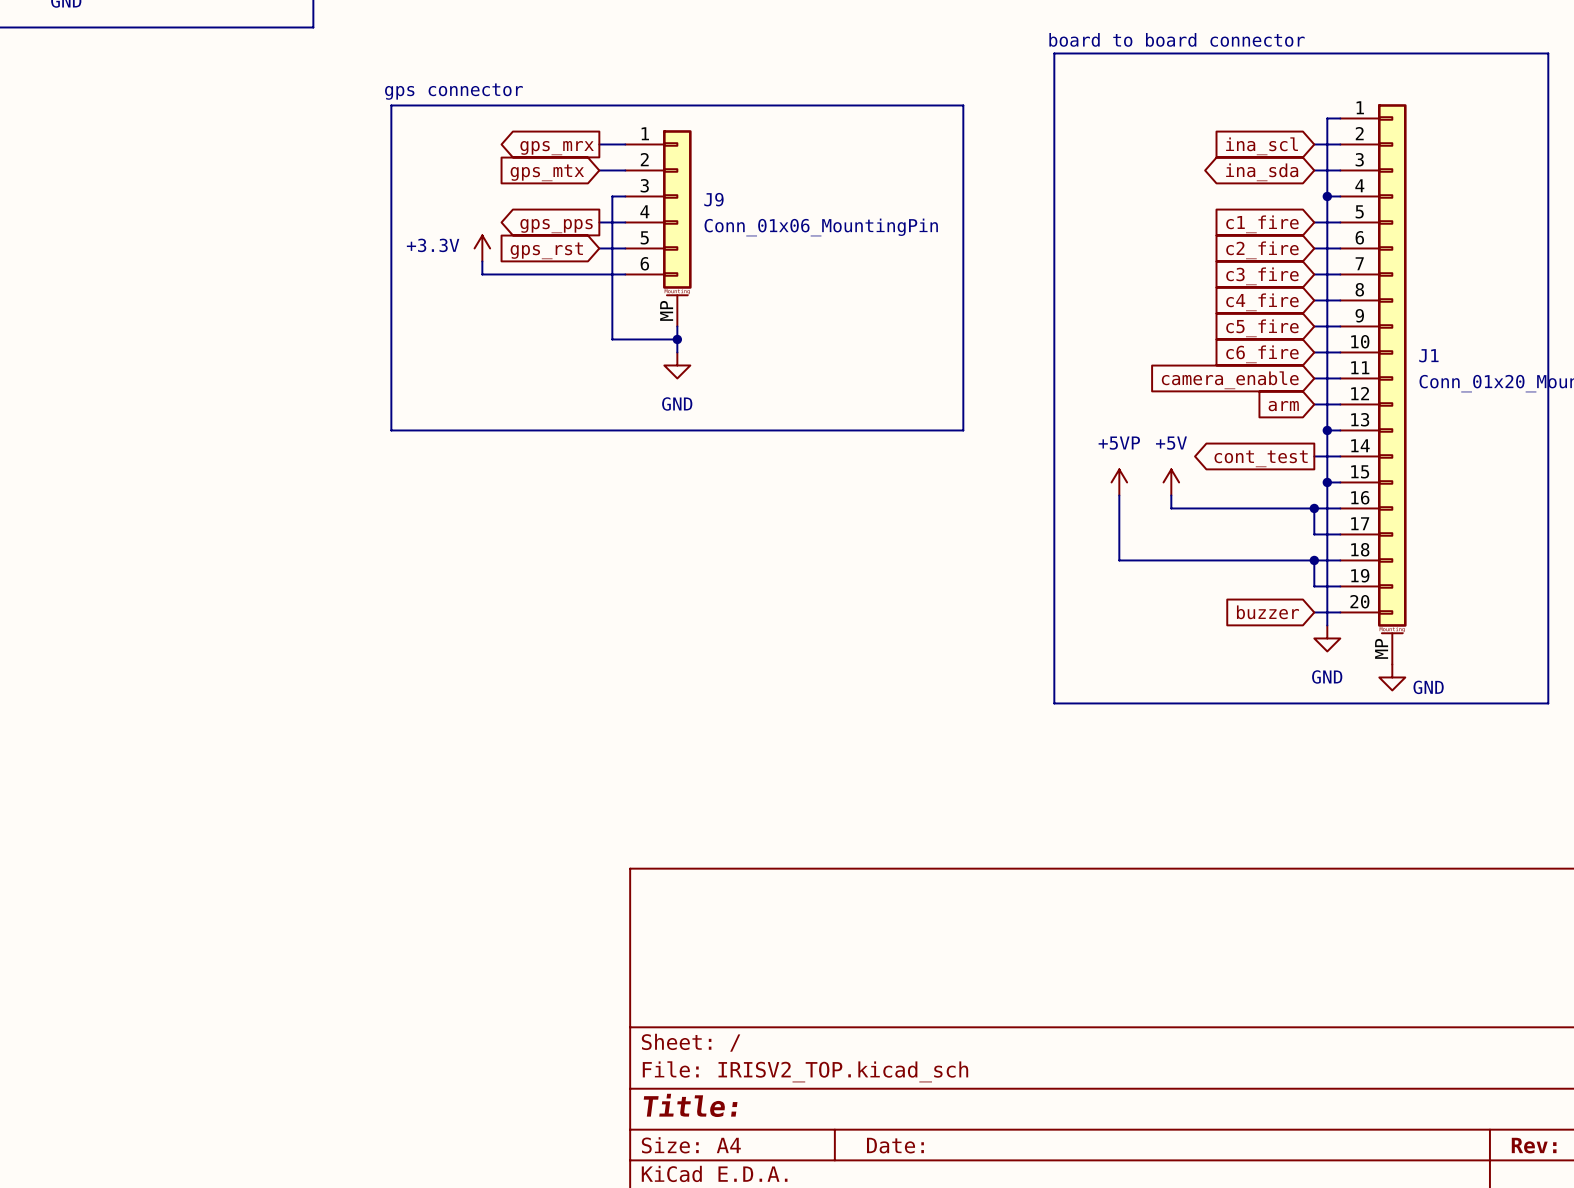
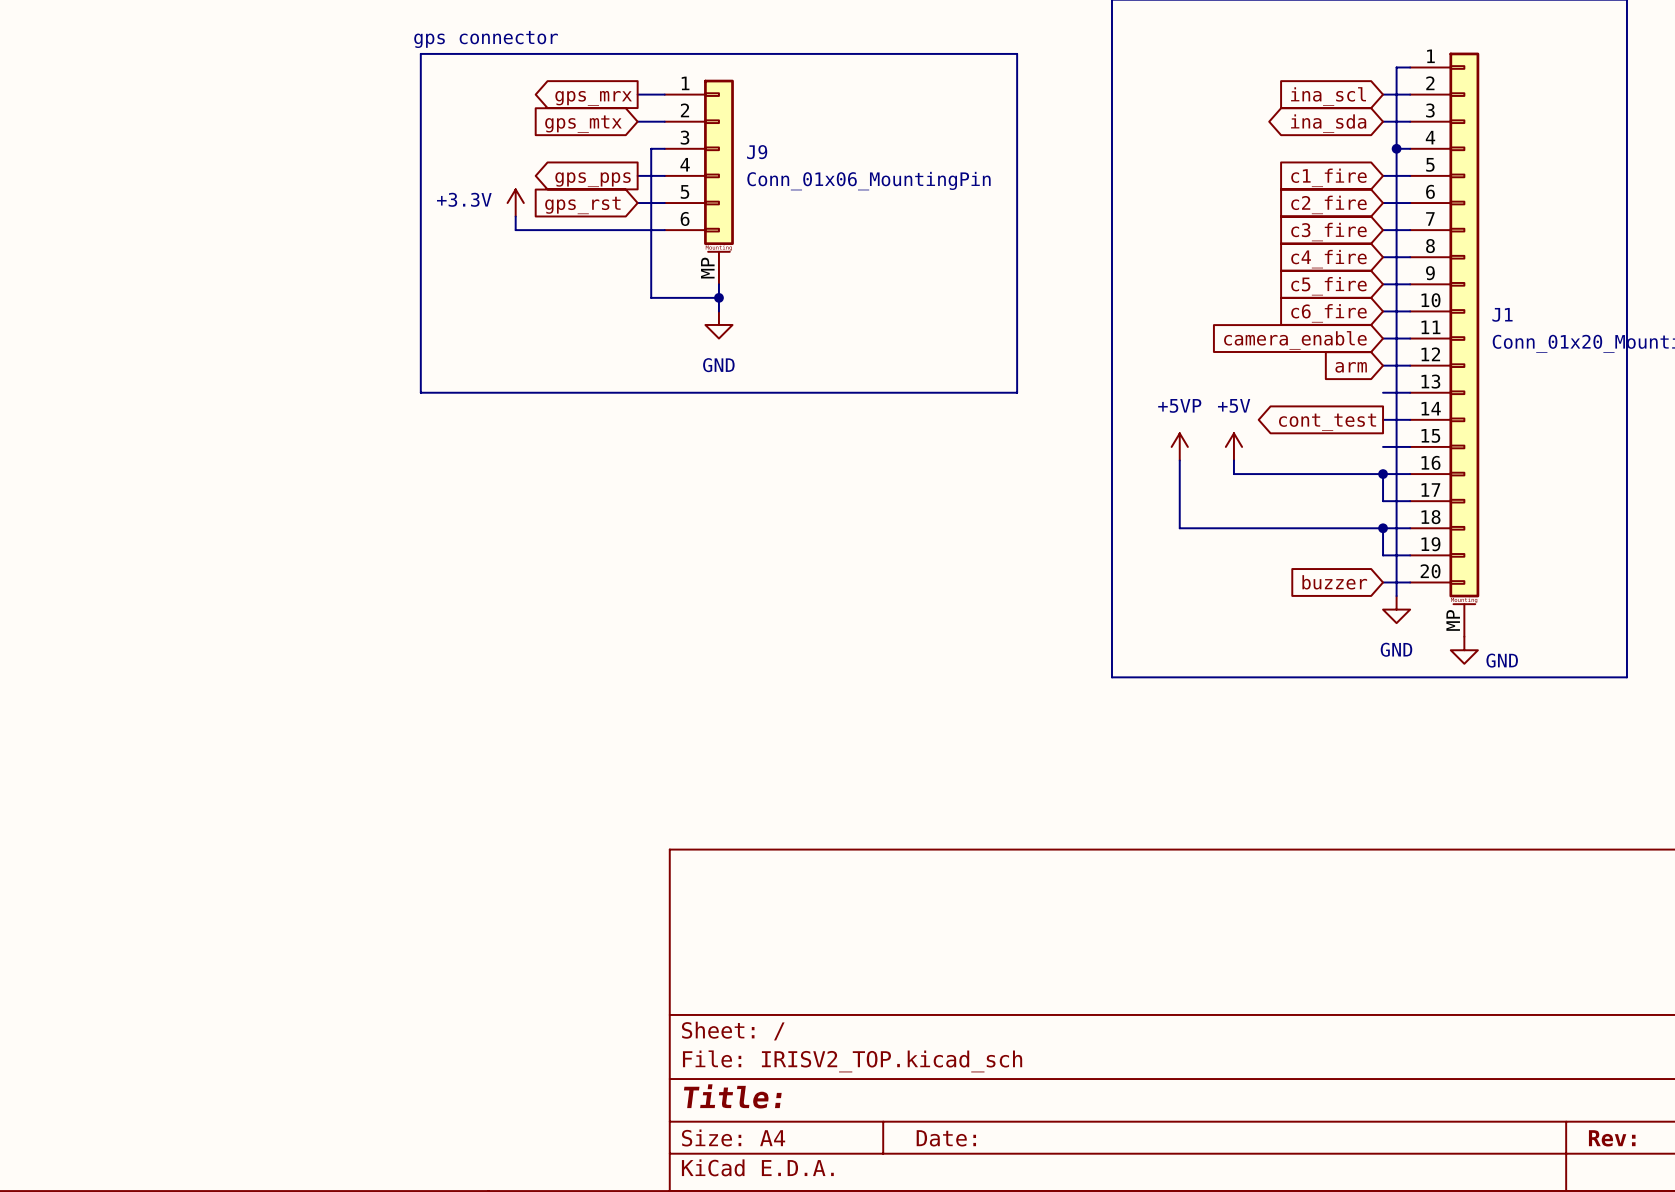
wire: none -> (1383, 392) (1396, 392)
junction: (1327, 430) -> none
wire: none -> (1383, 446) (1396, 446)
junction: (1327, 482) -> none

